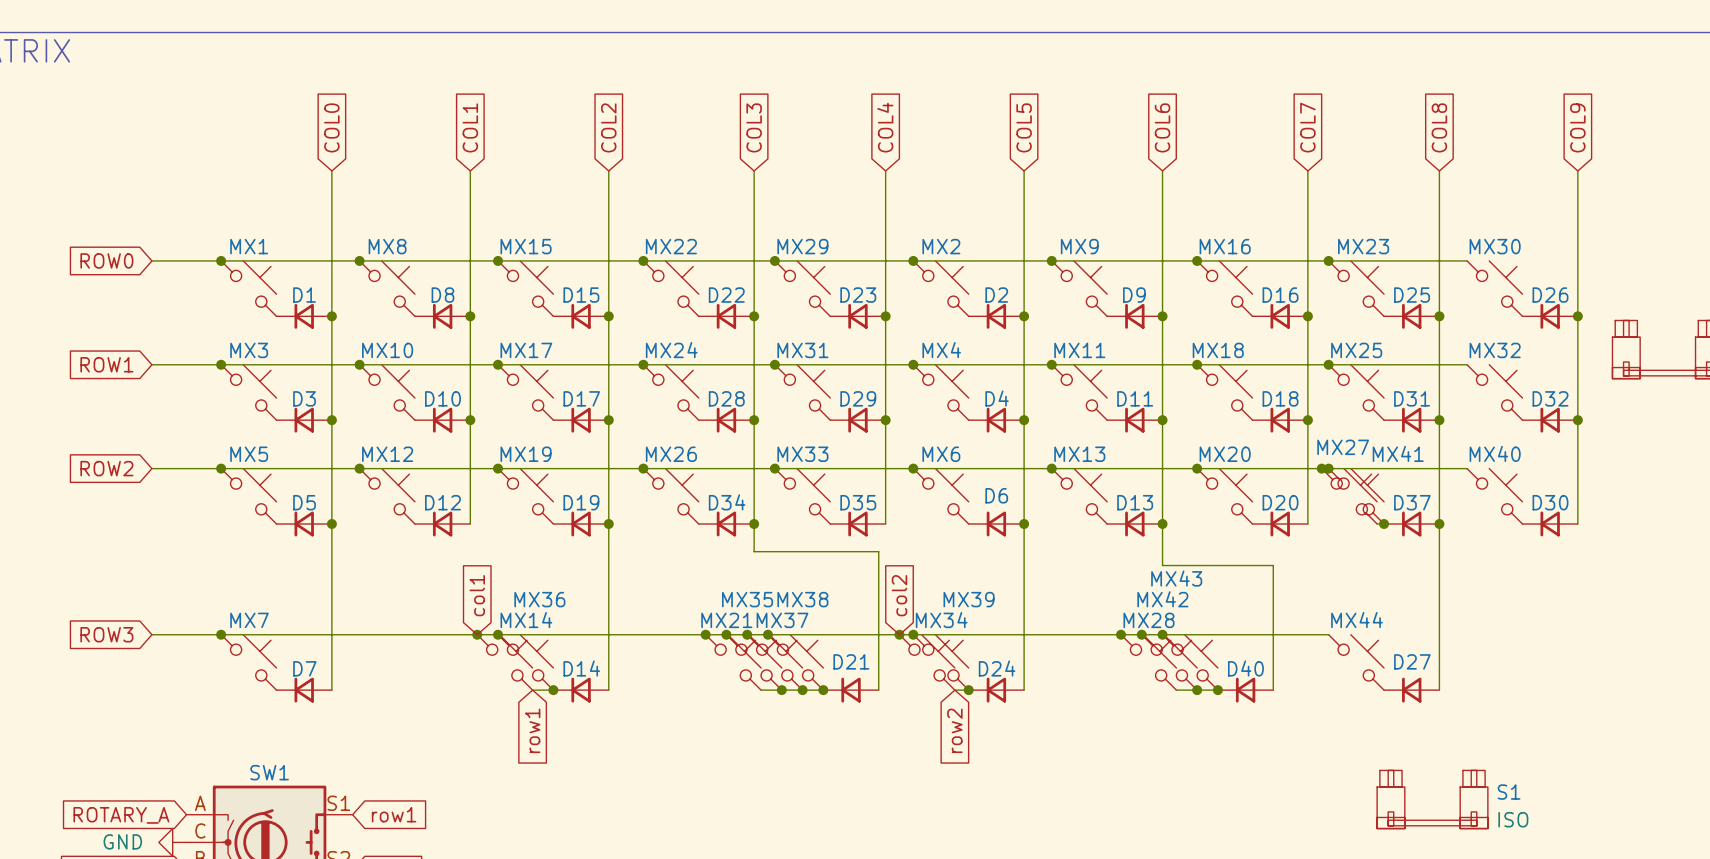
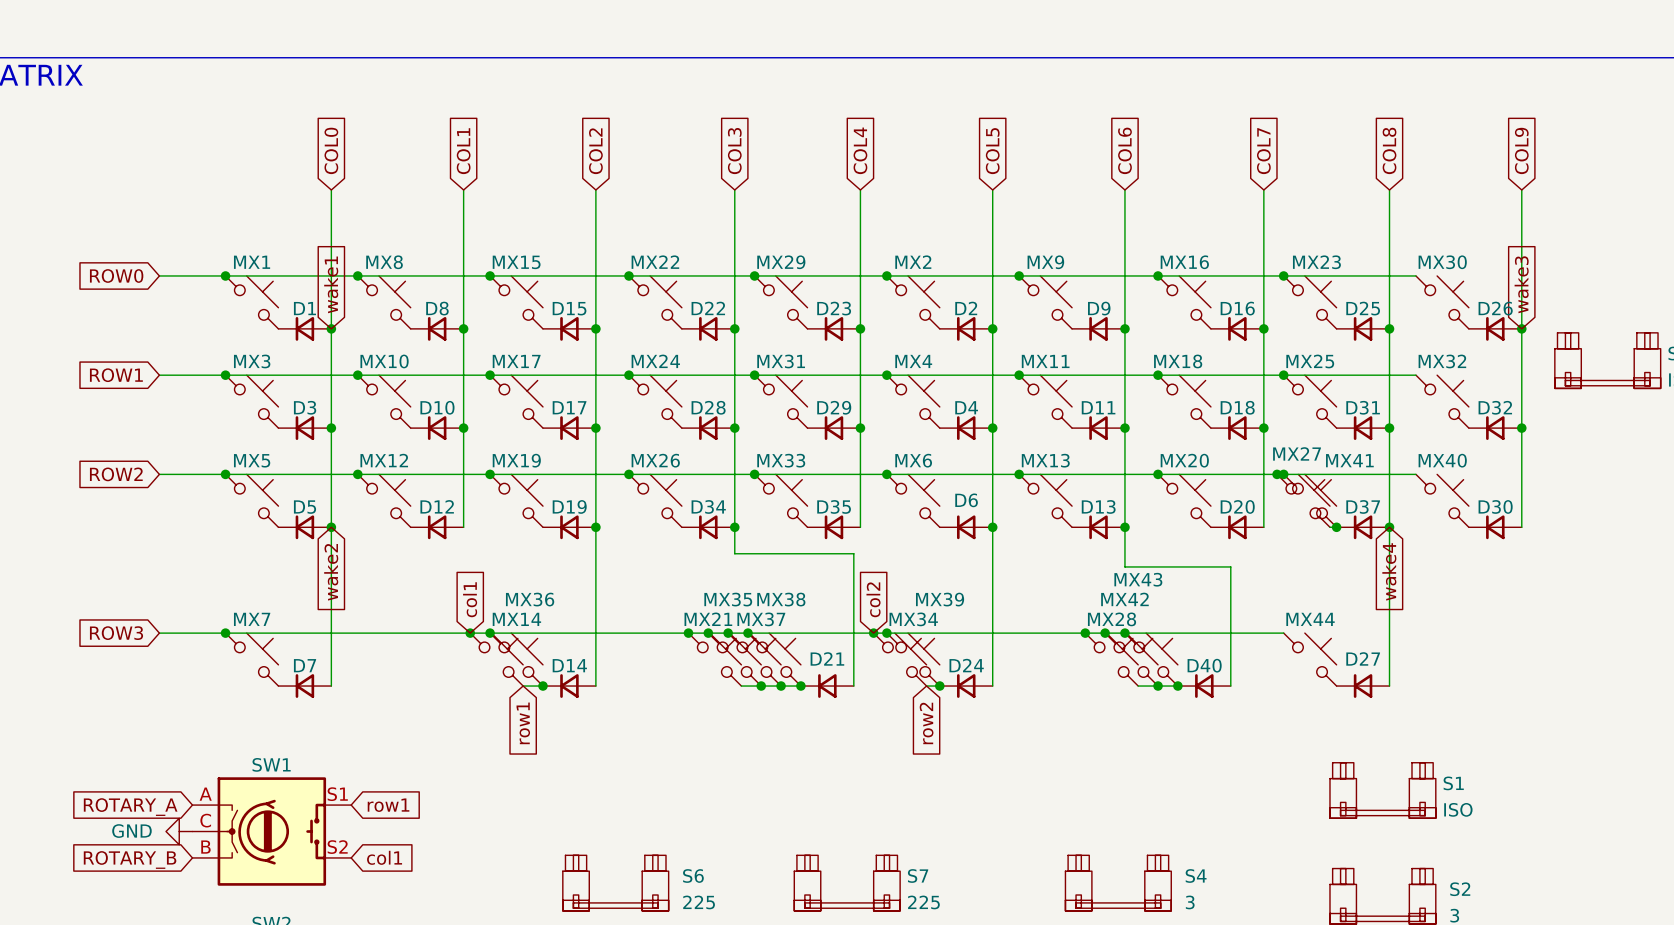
global label: none -> wake1 (331, 284)
global label: none -> wake3 (1521, 284)
global label: none -> wake2 (331, 572)
global label: none -> wake4 (1389, 571)

